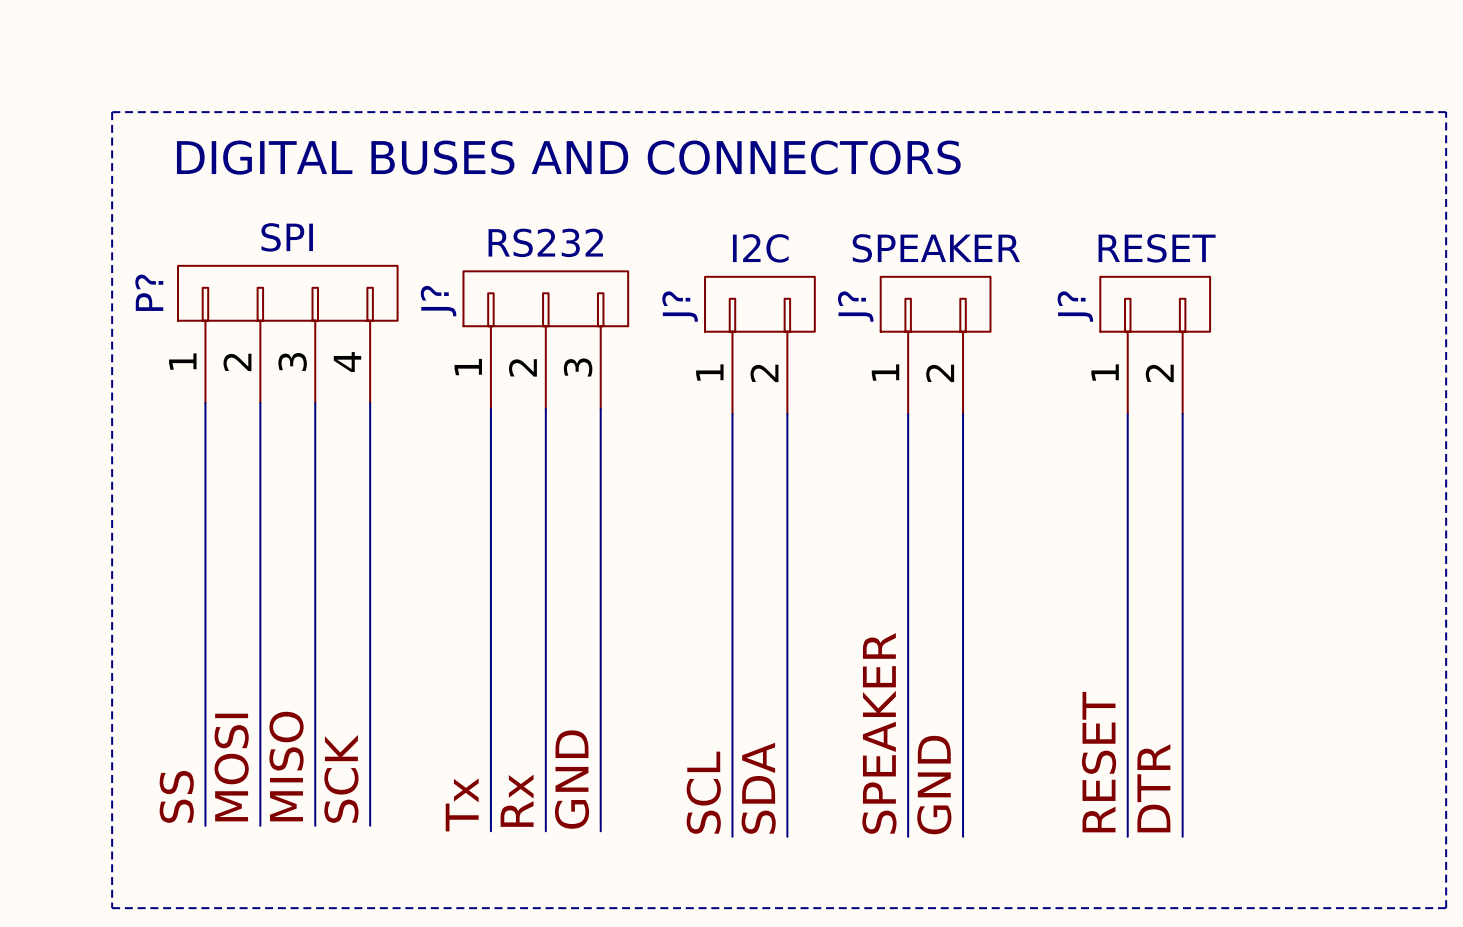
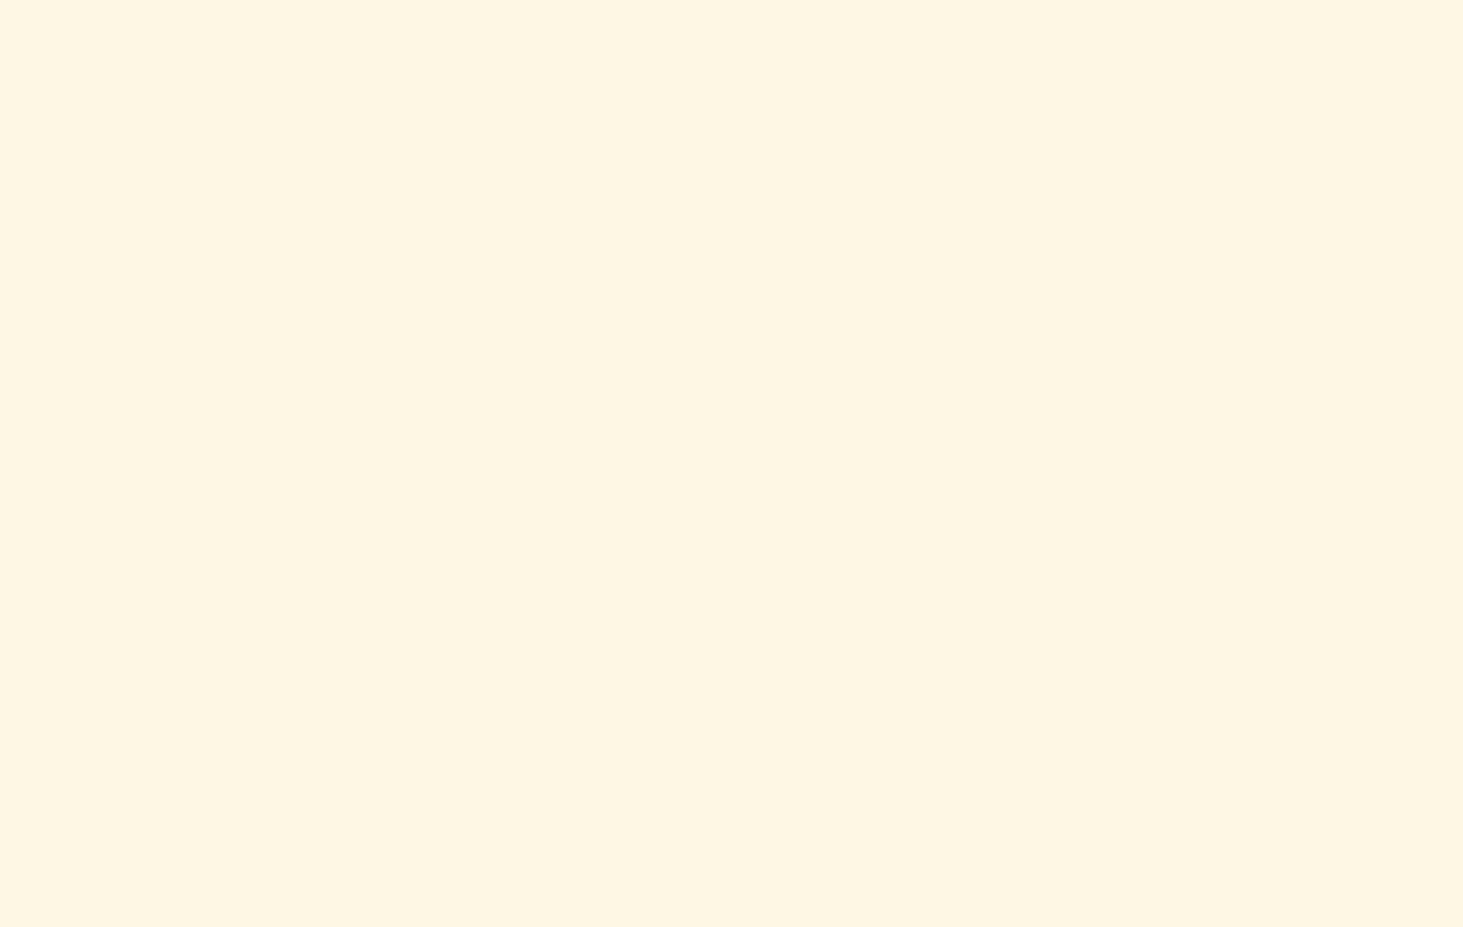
line: (112, 112) (1446, 112) (1446, 908) (112, 908) (112, 112) -> none
text: DIGITAL BUSES AND CONNECTORS (568, 157) -> none
P?: SPI (287, 334) -> none
J?: RS232 (545, 339) -> none
J?: I2C (759, 345) -> none
J?: SPEAKER (935, 345) -> none
J?: RESET (1155, 345) -> none
wire: (205, 403) (205, 825) -> none
wire: (260, 403) (260, 825) -> none
wire: (315, 403) (315, 825) -> none
wire: (370, 403) (370, 825) -> none
wire: (490, 408) (490, 831) -> none
wire: (545, 408) (545, 831) -> none
wire: (600, 408) (600, 831) -> none
wire: (732, 414) (732, 836) -> none
wire: (787, 414) (787, 836) -> none
wire: (908, 414) (908, 836) -> none
wire: (963, 414) (963, 836) -> none
wire: (1127, 414) (1127, 836) -> none
wire: (1182, 414) (1182, 836) -> none
label: SPEAKER (879, 733) -> none
label: RESET (1099, 762) -> none
label: MISO (286, 766) -> none
label: MOSI (231, 767) -> none
label: SCK (341, 778) -> none
label: GND (572, 779) -> none
label: GND (934, 785) -> none
label: SDA (758, 788) -> none
label: DTR (1153, 788) -> none
label: SCL (703, 792) -> none
label: SS (176, 796) -> none
label: Rx (517, 800) -> none
label: Tx (462, 804) -> none

